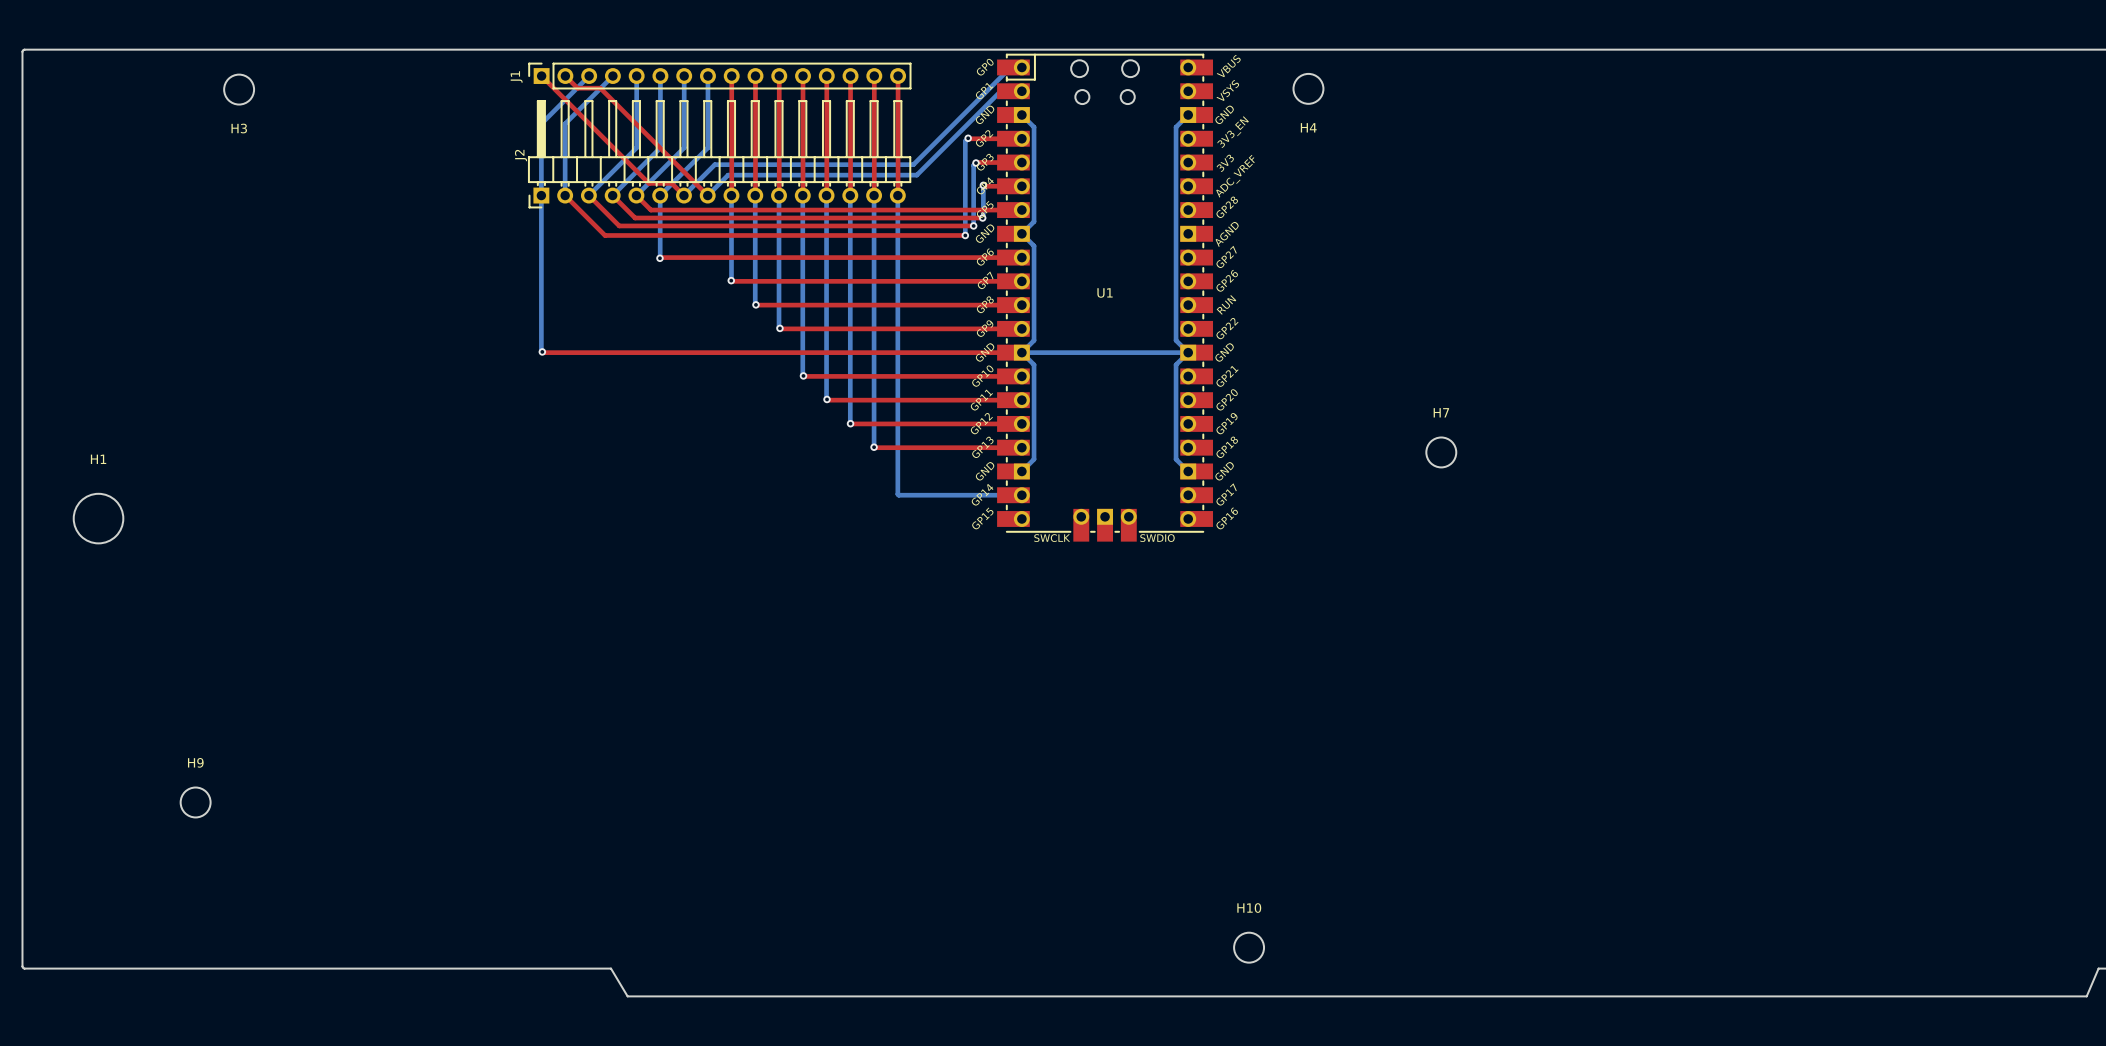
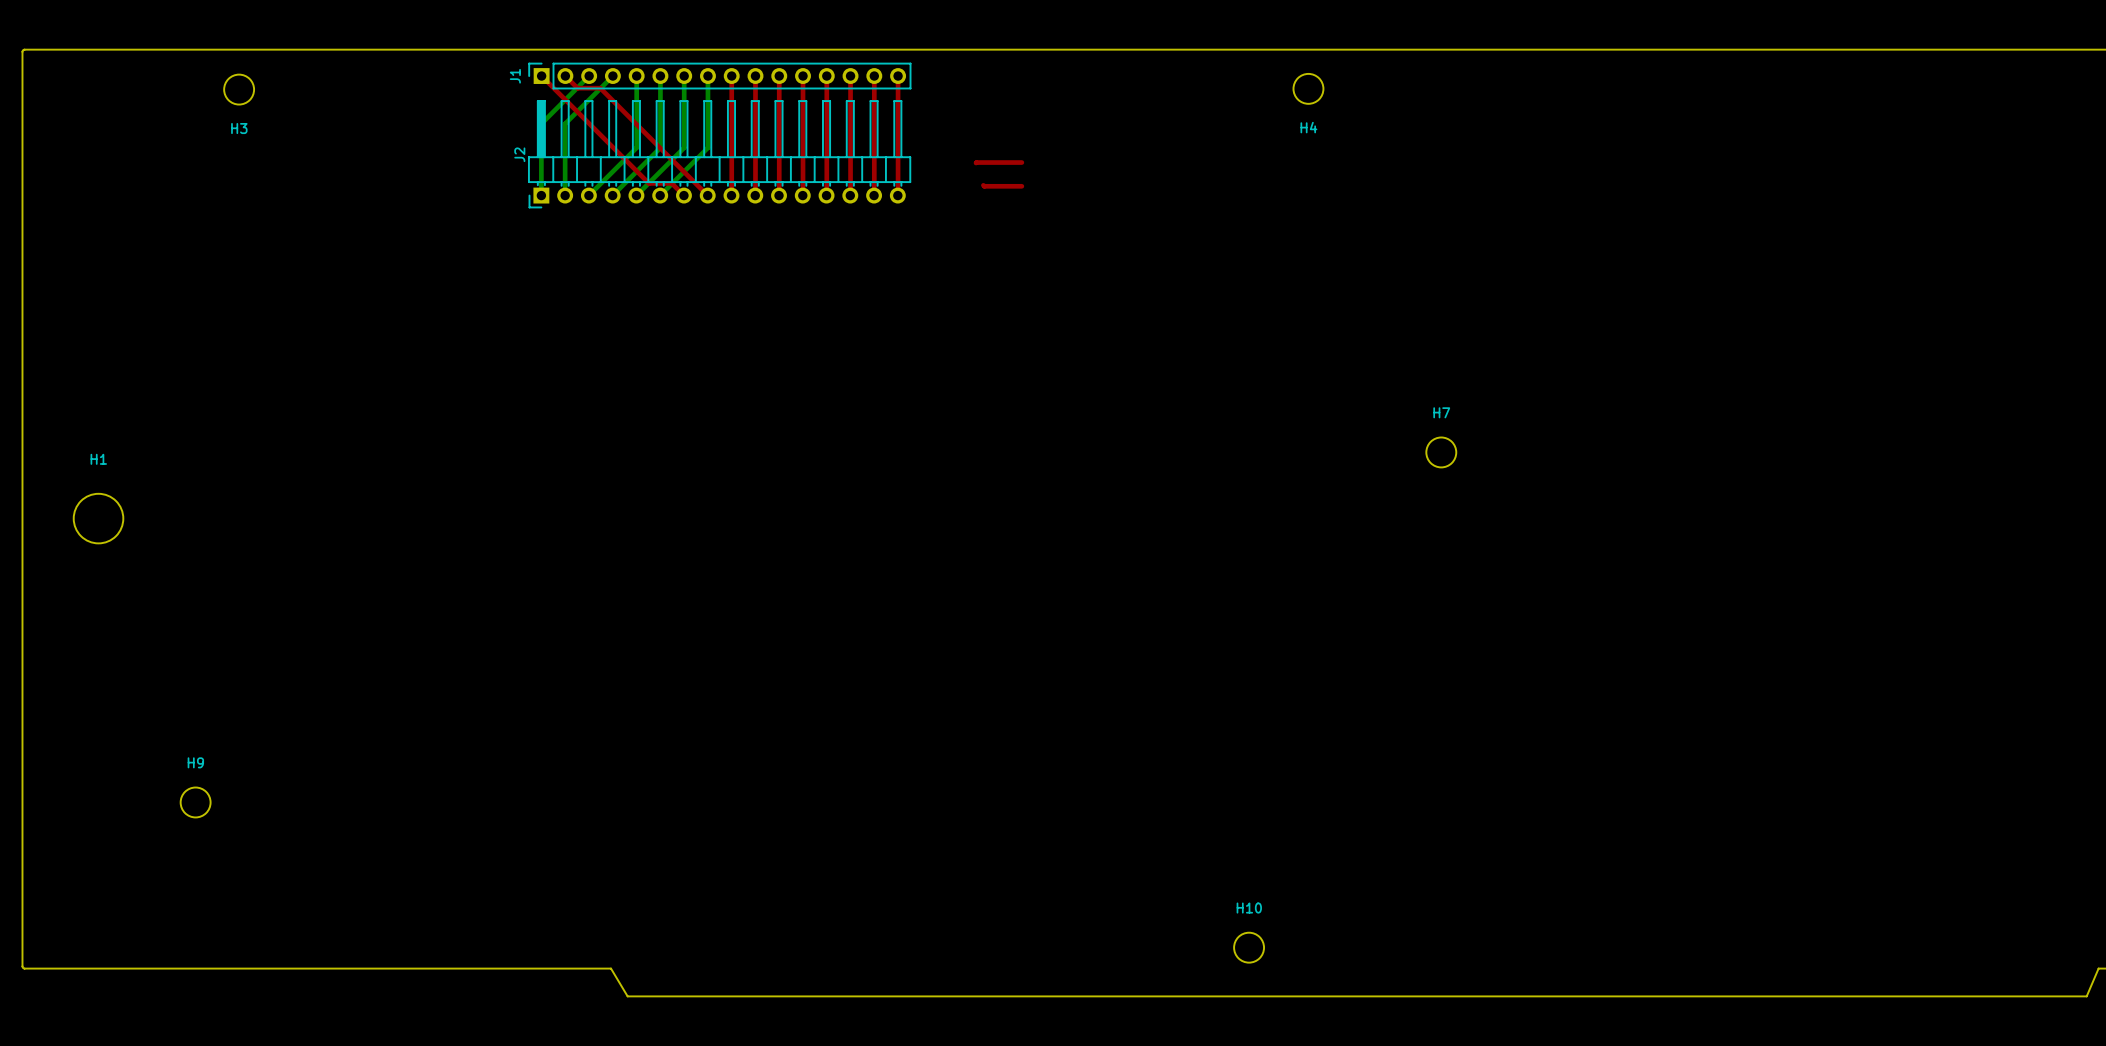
bottom track: (1021, 67) (1010, 67) (913, 164) (714, 164) (683, 195) -> none
bottom track: (1021, 91) (1000, 91) (916, 175) (728, 175) (707, 195) -> none
bottom track: (1021, 115) (1034, 127) (1034, 221) (1021, 233) (1034, 245) (1034, 340) (1021, 352) -> none
bottom track: (1188, 115) (1176, 127) (1176, 340) (1188, 352) -> none
top track: (968, 138) (1021, 138) -> none
bottom track: (968, 138) (965, 141) (965, 235) -> none
via: (968, 138) -> none
bottom track: (976, 163) (973, 165) (973, 225) -> none
via: (976, 163) -> none
bottom track: (983, 185) (982, 218) -> none
via: (983, 185) -> none
bottom track: (541, 195) (542, 351) -> none
top track: (565, 195) (605, 235) (965, 235) -> none
top track: (588, 195) (619, 225) (973, 225) -> none
top track: (612, 195) (635, 218) (982, 218) -> none
top track: (636, 195) (650, 210) (1021, 210) -> none
bottom track: (660, 195) (659, 258) -> none
bottom track: (731, 195) (731, 280) -> none
bottom track: (755, 195) (755, 304) -> none
bottom track: (779, 195) (779, 328) -> none
bottom track: (802, 195) (803, 375) -> none
bottom track: (826, 195) (827, 399) -> none
bottom track: (850, 195) (850, 423) -> none
bottom track: (874, 195) (874, 447) -> none
bottom track: (897, 195) (897, 494) (1021, 495) -> none
via: (982, 218) -> none
via: (973, 225) -> none
via: (965, 235) -> none
top track: (1021, 257) (659, 258) -> none
via: (659, 258) -> none
top track: (731, 280) (1021, 281) -> none
via: (731, 280) -> none
U1: (1105, 297) -> none
top track: (755, 304) (1021, 305) -> none
via: (755, 304) -> none
top track: (779, 328) (1021, 328) -> none
via: (779, 328) -> none
top track: (542, 351) (1021, 352) -> none
via: (542, 351) -> none
bottom track: (1021, 352) (1188, 352) -> none
bottom track: (1021, 352) (1034, 364) (1034, 459) (1021, 471) -> none
bottom track: (1188, 352) (1176, 364) (1176, 459) (1188, 471) -> none
top track: (803, 375) (1021, 376) -> none
via: (803, 375) -> none
top track: (827, 399) (1021, 400) -> none
via: (827, 399) -> none
top track: (850, 423) (1021, 423) -> none
via: (850, 423) -> none
top track: (874, 447) (1021, 447) -> none
via: (874, 447) -> none

